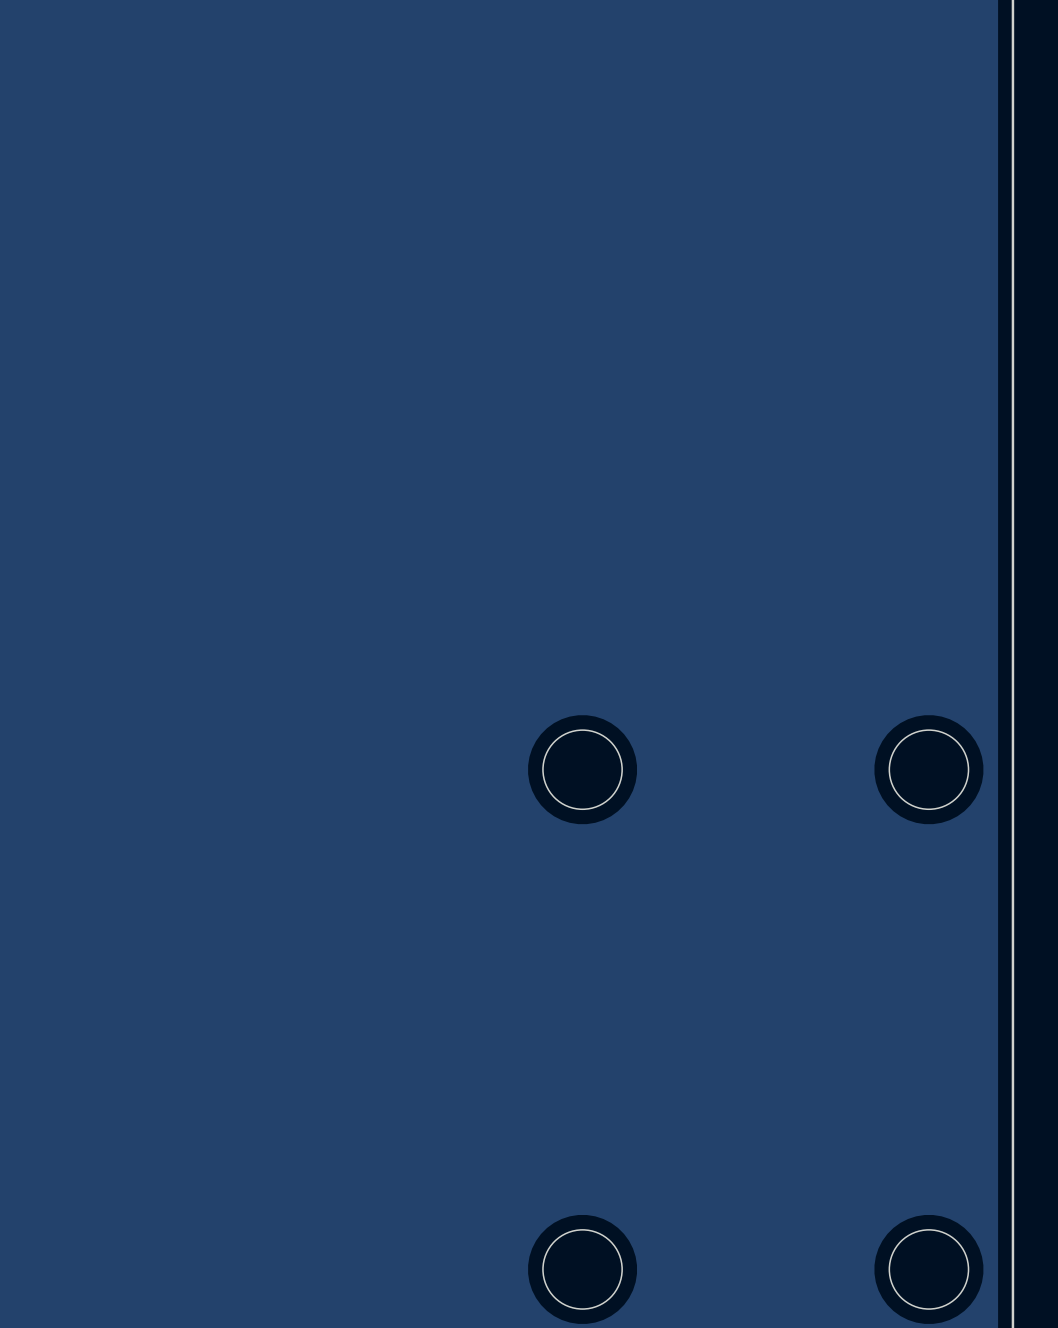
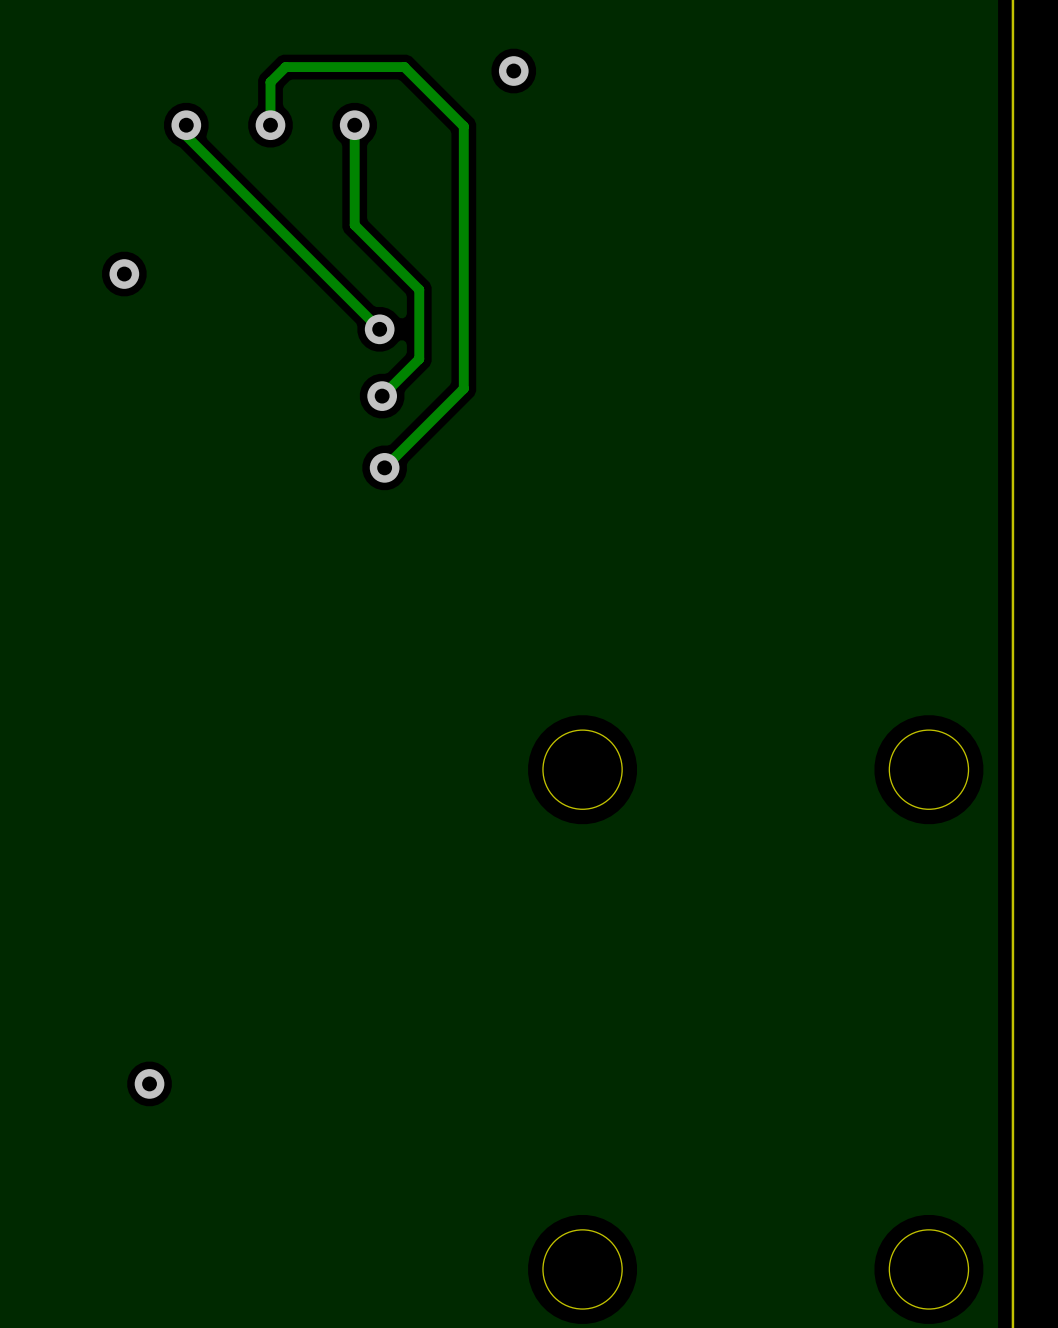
via: none -> (513, 71)
track: none -> (186, 125) (186, 135) (379, 329)
via: none -> (186, 125)
track: none -> (270, 125) (270, 82) (285, 67) (404, 67) (463, 126) (463, 388) (384, 467)
via: none -> (270, 125)
track: none -> (354, 125) (354, 225) (419, 289) (419, 359) (382, 396)
via: none -> (354, 125)
via: none -> (124, 274)
via: none -> (379, 329)
via: none -> (382, 396)
via: none -> (384, 467)
via: none -> (149, 1083)

